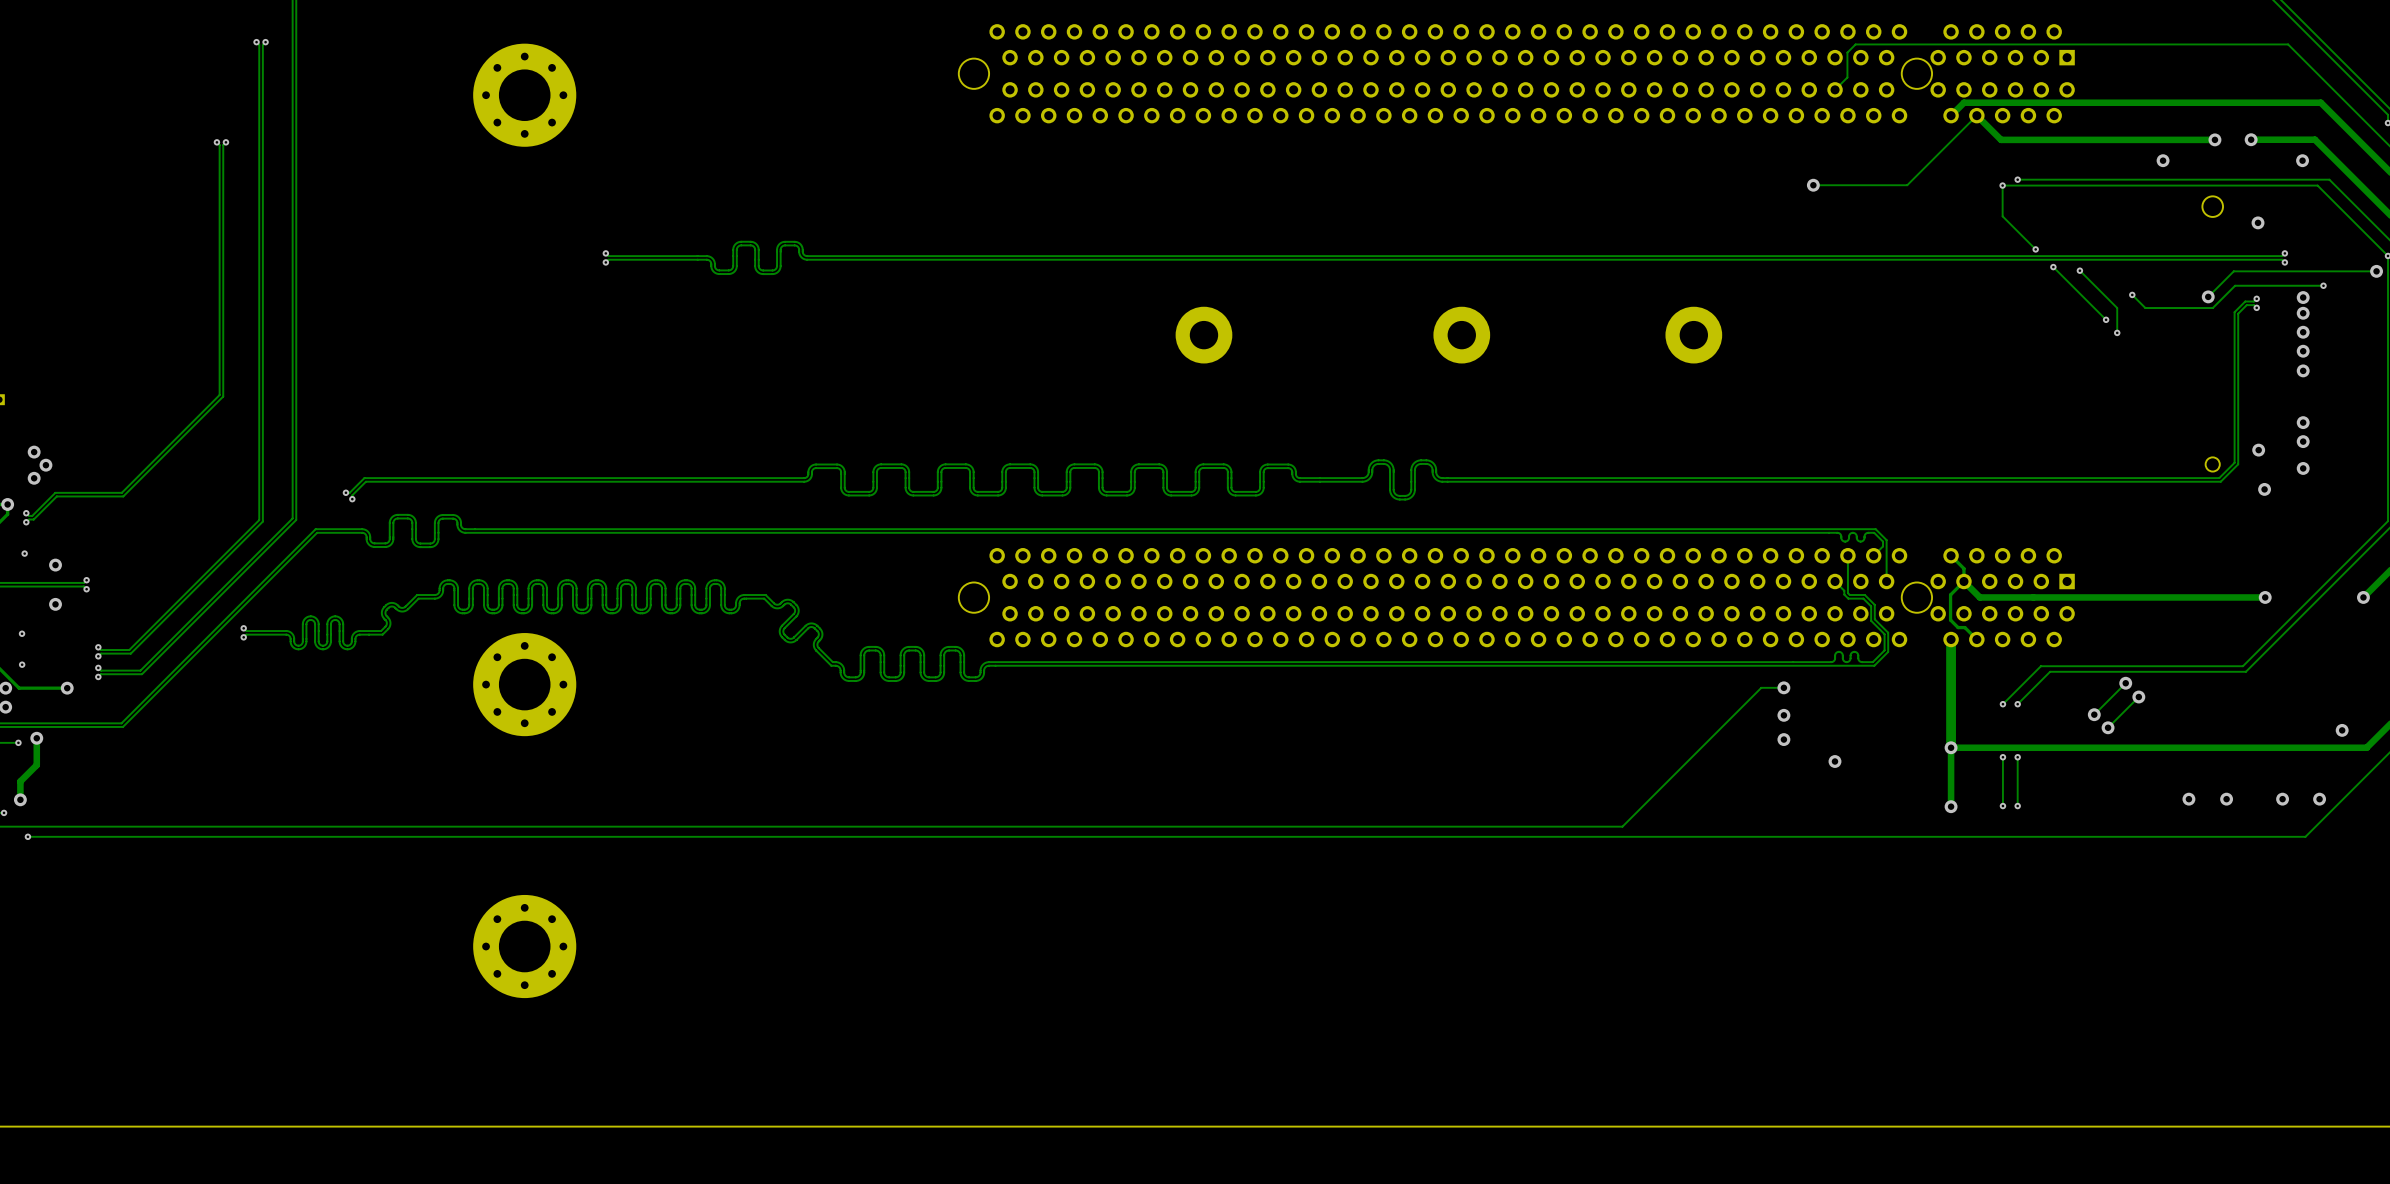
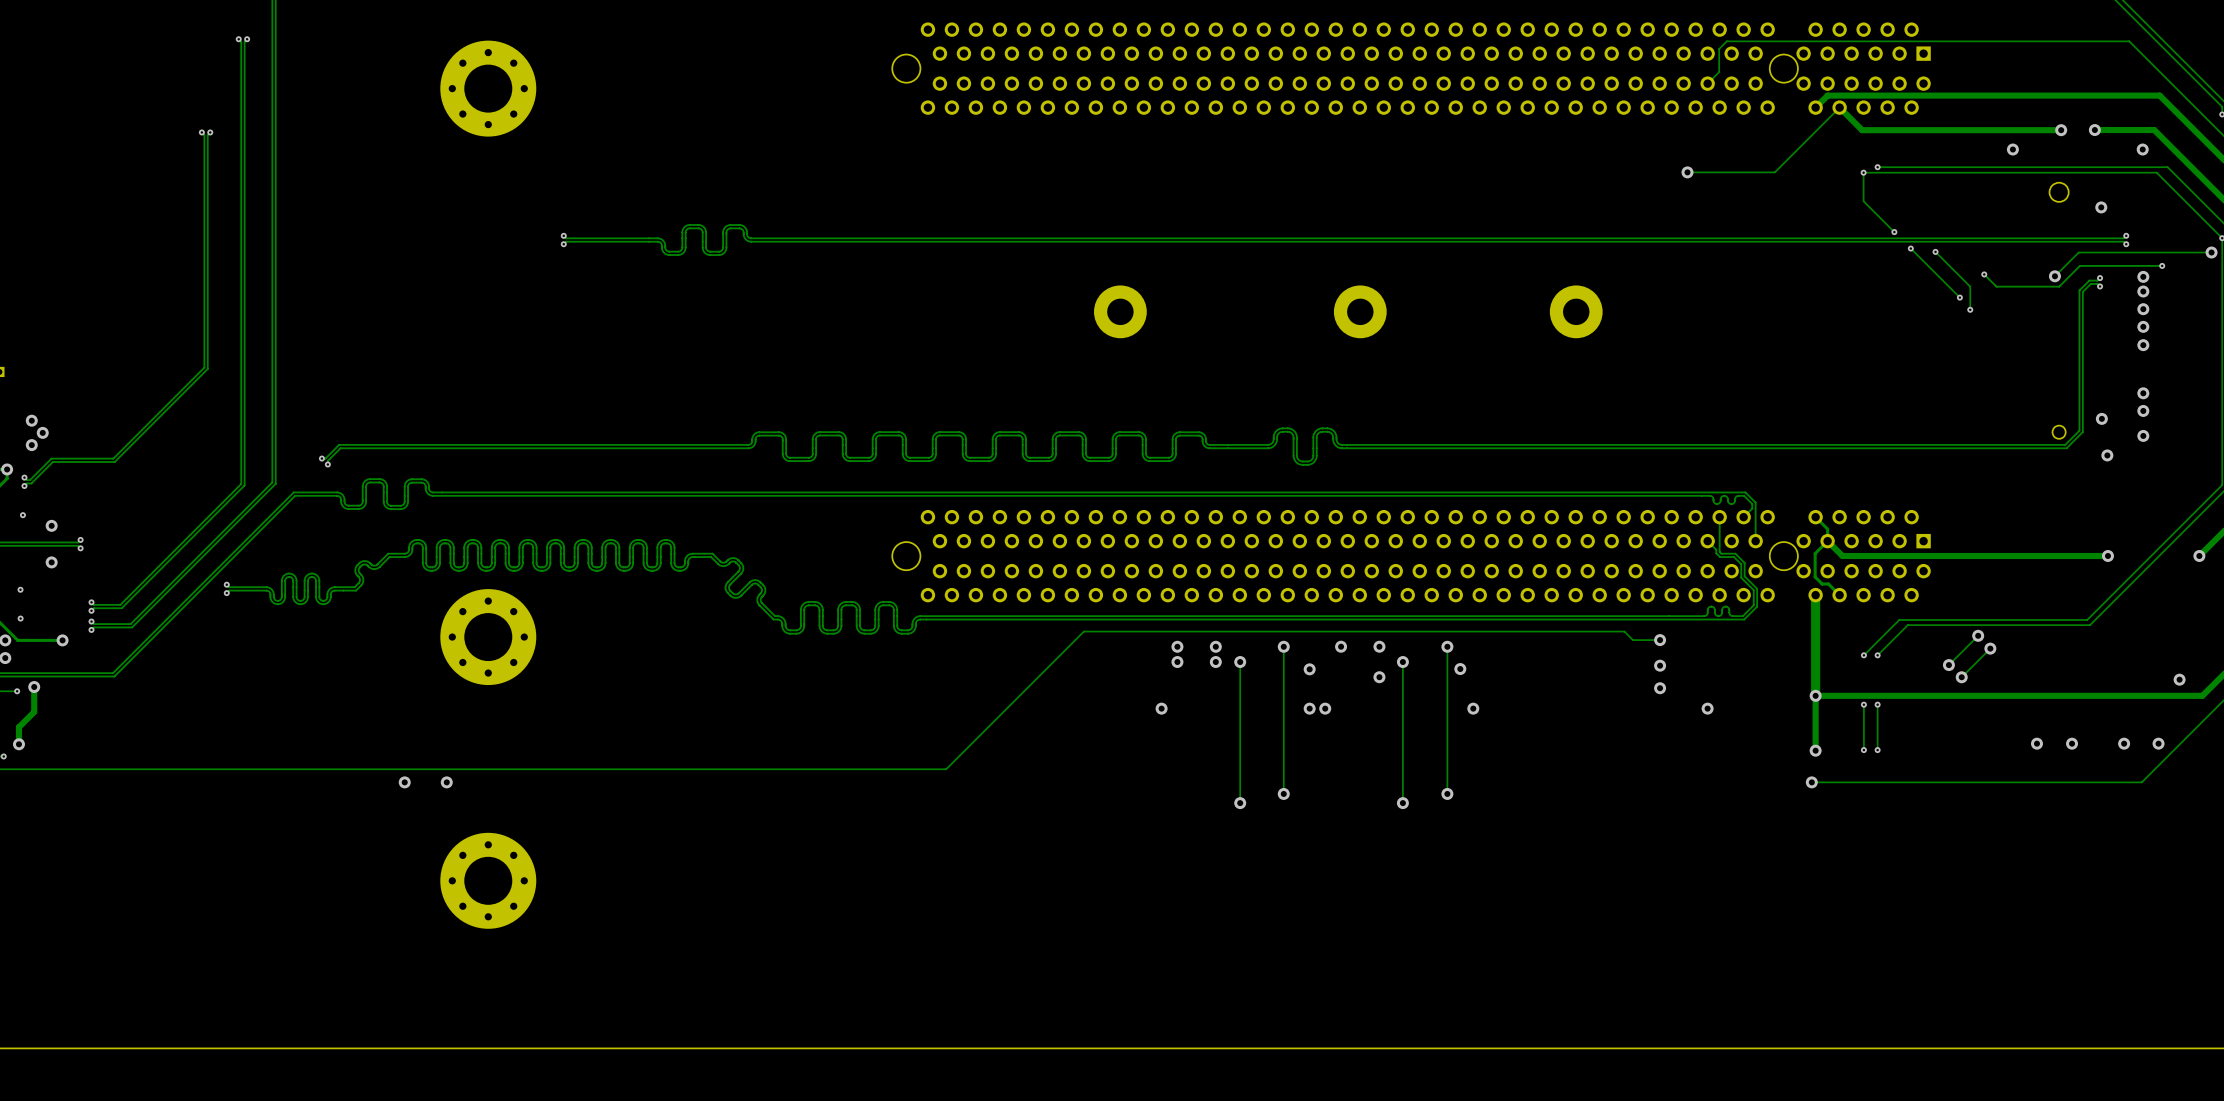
track: (1761, 687) (1622, 826) (1016, 826) -> (1639, 640) (1632, 640) (1624, 631) (1083, 631) (946, 769)
via: none -> (1341, 646)
via: none -> (1379, 646)
via: none -> (1177, 646)
via: none -> (1215, 646)
track: none -> (1283, 646) (1283, 793)
via: none -> (1283, 646)
track: none -> (1447, 646) (1447, 793)
via: none -> (1447, 646)
via: none -> (1177, 662)
via: none -> (1215, 662)
track: none -> (1240, 662) (1240, 803)
via: none -> (1240, 662)
track: none -> (1402, 662) (1402, 803)
via: none -> (1402, 662)
via: none -> (1460, 669)
via: none -> (1309, 669)
via: none -> (1379, 677)
via: none -> (1161, 708)
via: none -> (1309, 708)
via: none -> (1325, 708)
via: none -> (1473, 708)
via: (27, 836) -> none
track: (2305, 836) (27, 836) -> (2145, 778) (2141, 782) (1811, 782)
via: none -> (404, 782)
via: none -> (446, 782)
via: none -> (1811, 782)
via: none -> (1283, 793)
via: none -> (1447, 793)
via: none -> (1240, 803)
via: none -> (1402, 803)

